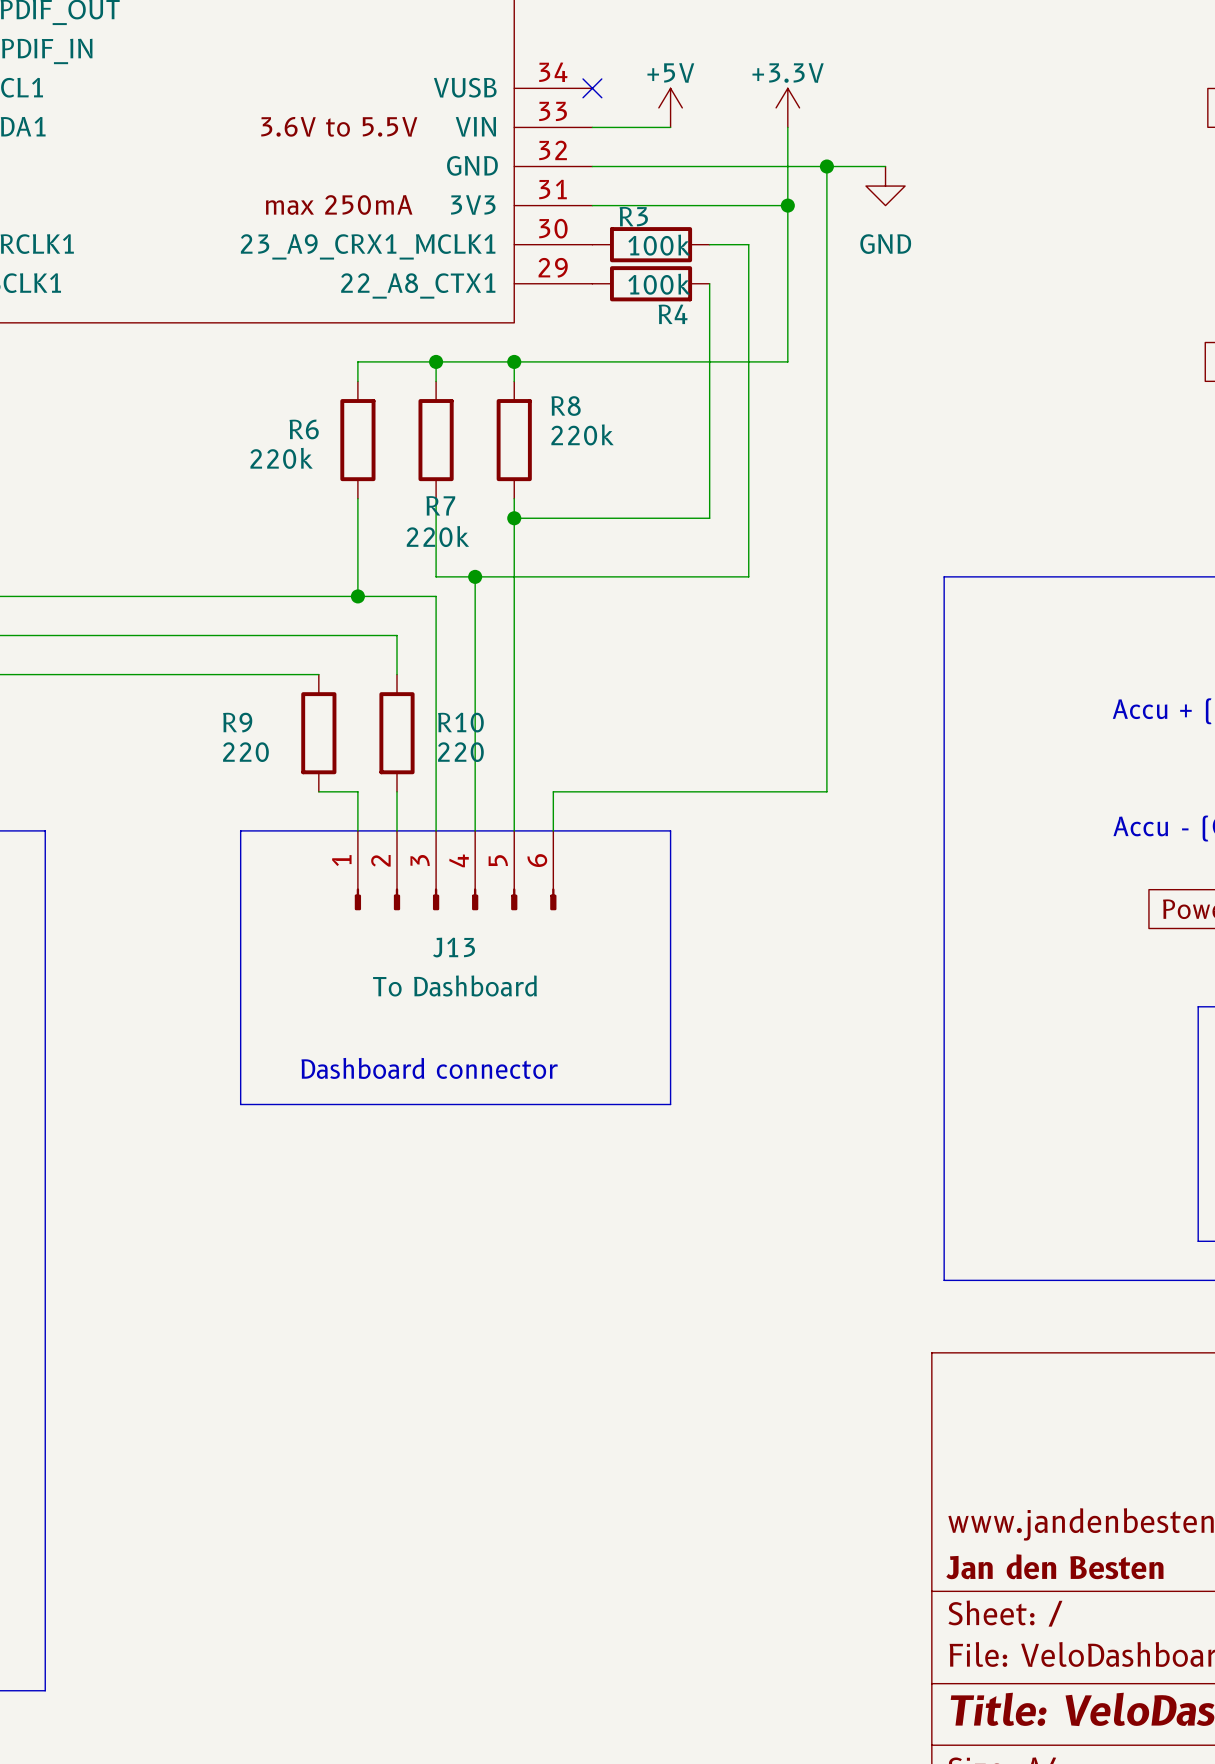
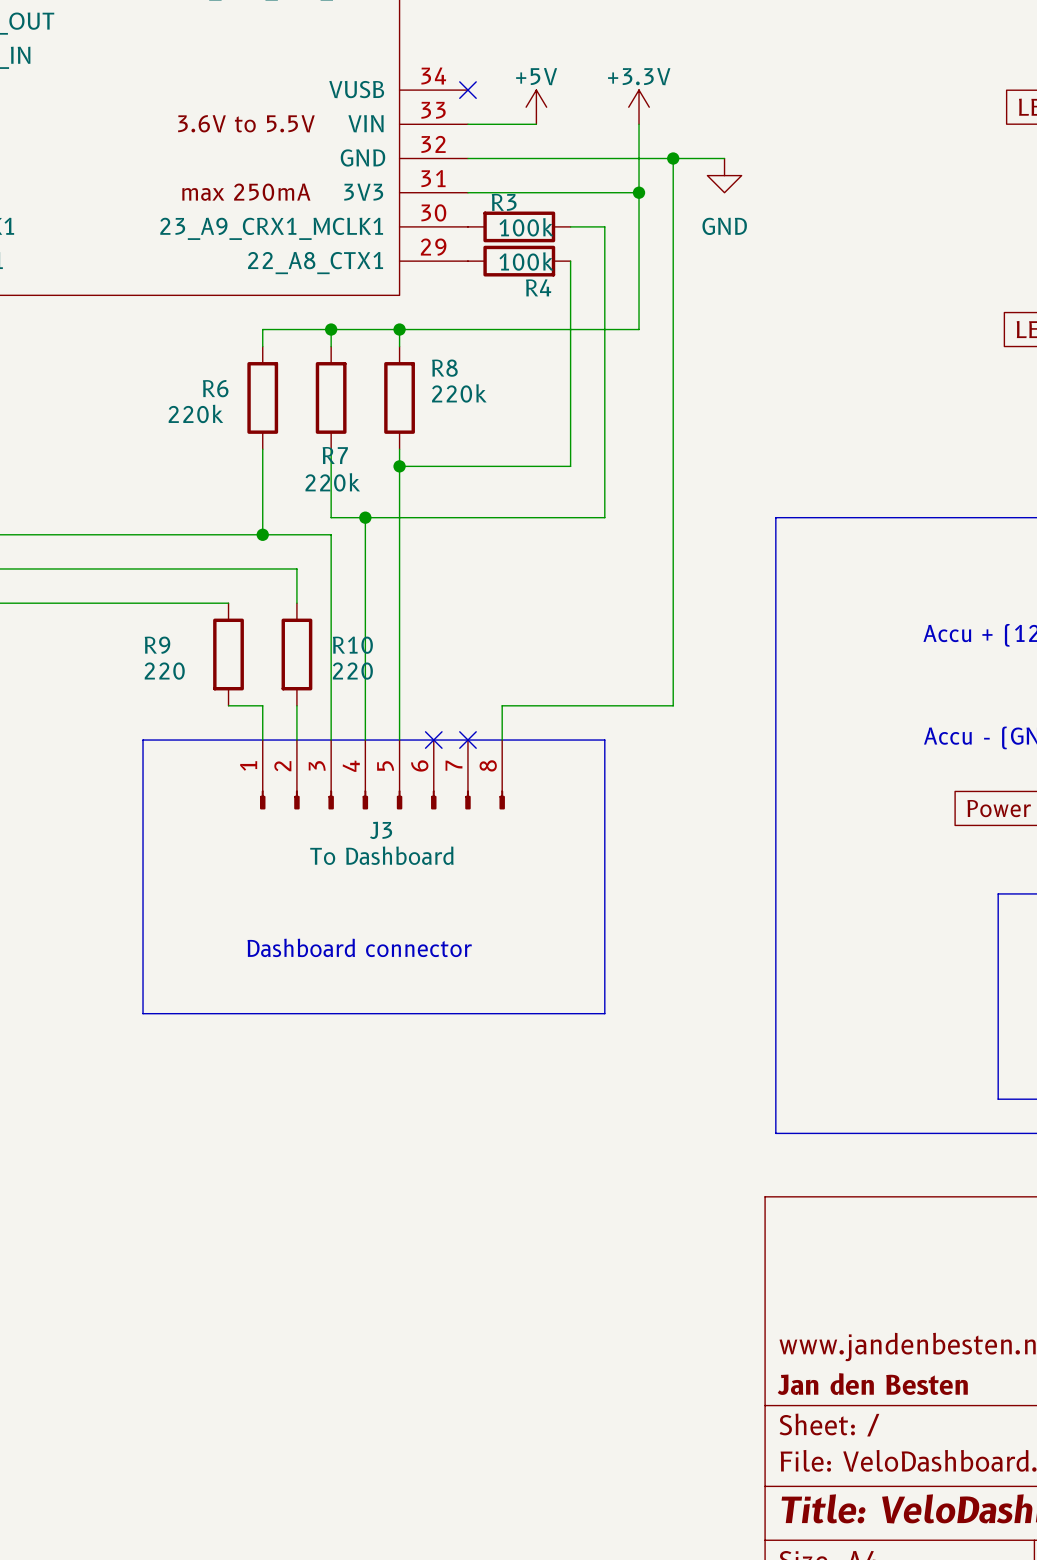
wire: (631, 791) (553, 791) (553, 830) -> (502, 705) (502, 740)
line: (240, 830) (240, 1104) (670, 1104) (670, 830) -> (160, 740) (143, 740) (143, 1013) (604, 1013) (604, 740) (536, 740)
no-connect mark: none -> (433, 740)
no-connect mark: none -> (467, 740)
J13: To Dashboard (455, 870) -> none
J3: none -> To Dashboard (382, 774)
text position: Dashboard connector (429, 1068) -> Dashboard connector (359, 947)

